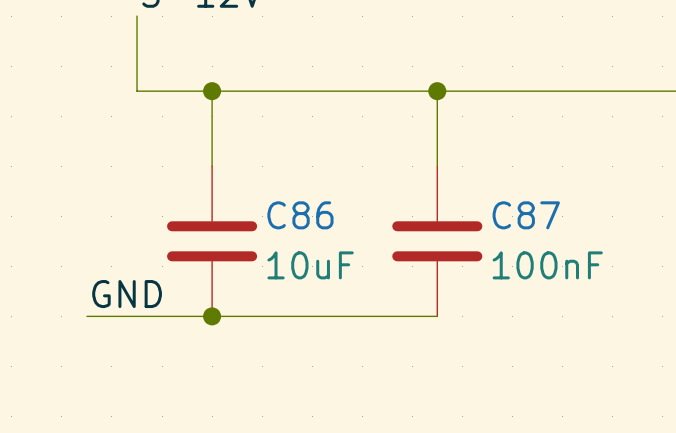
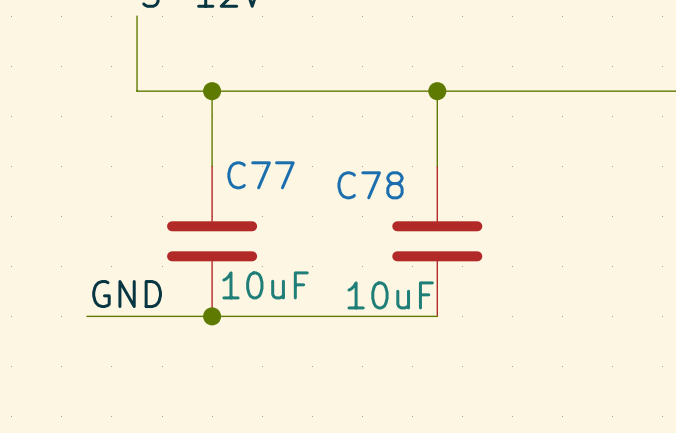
C86 name: C86 (300, 215) -> C77 (261, 175)
C87 name: C87 (526, 215) -> C78 (370, 185)
C86 value position: 10uF (310, 265) -> 10uF (265, 285)
C87 value: 100nF (547, 265) -> 10uF (390, 295)

